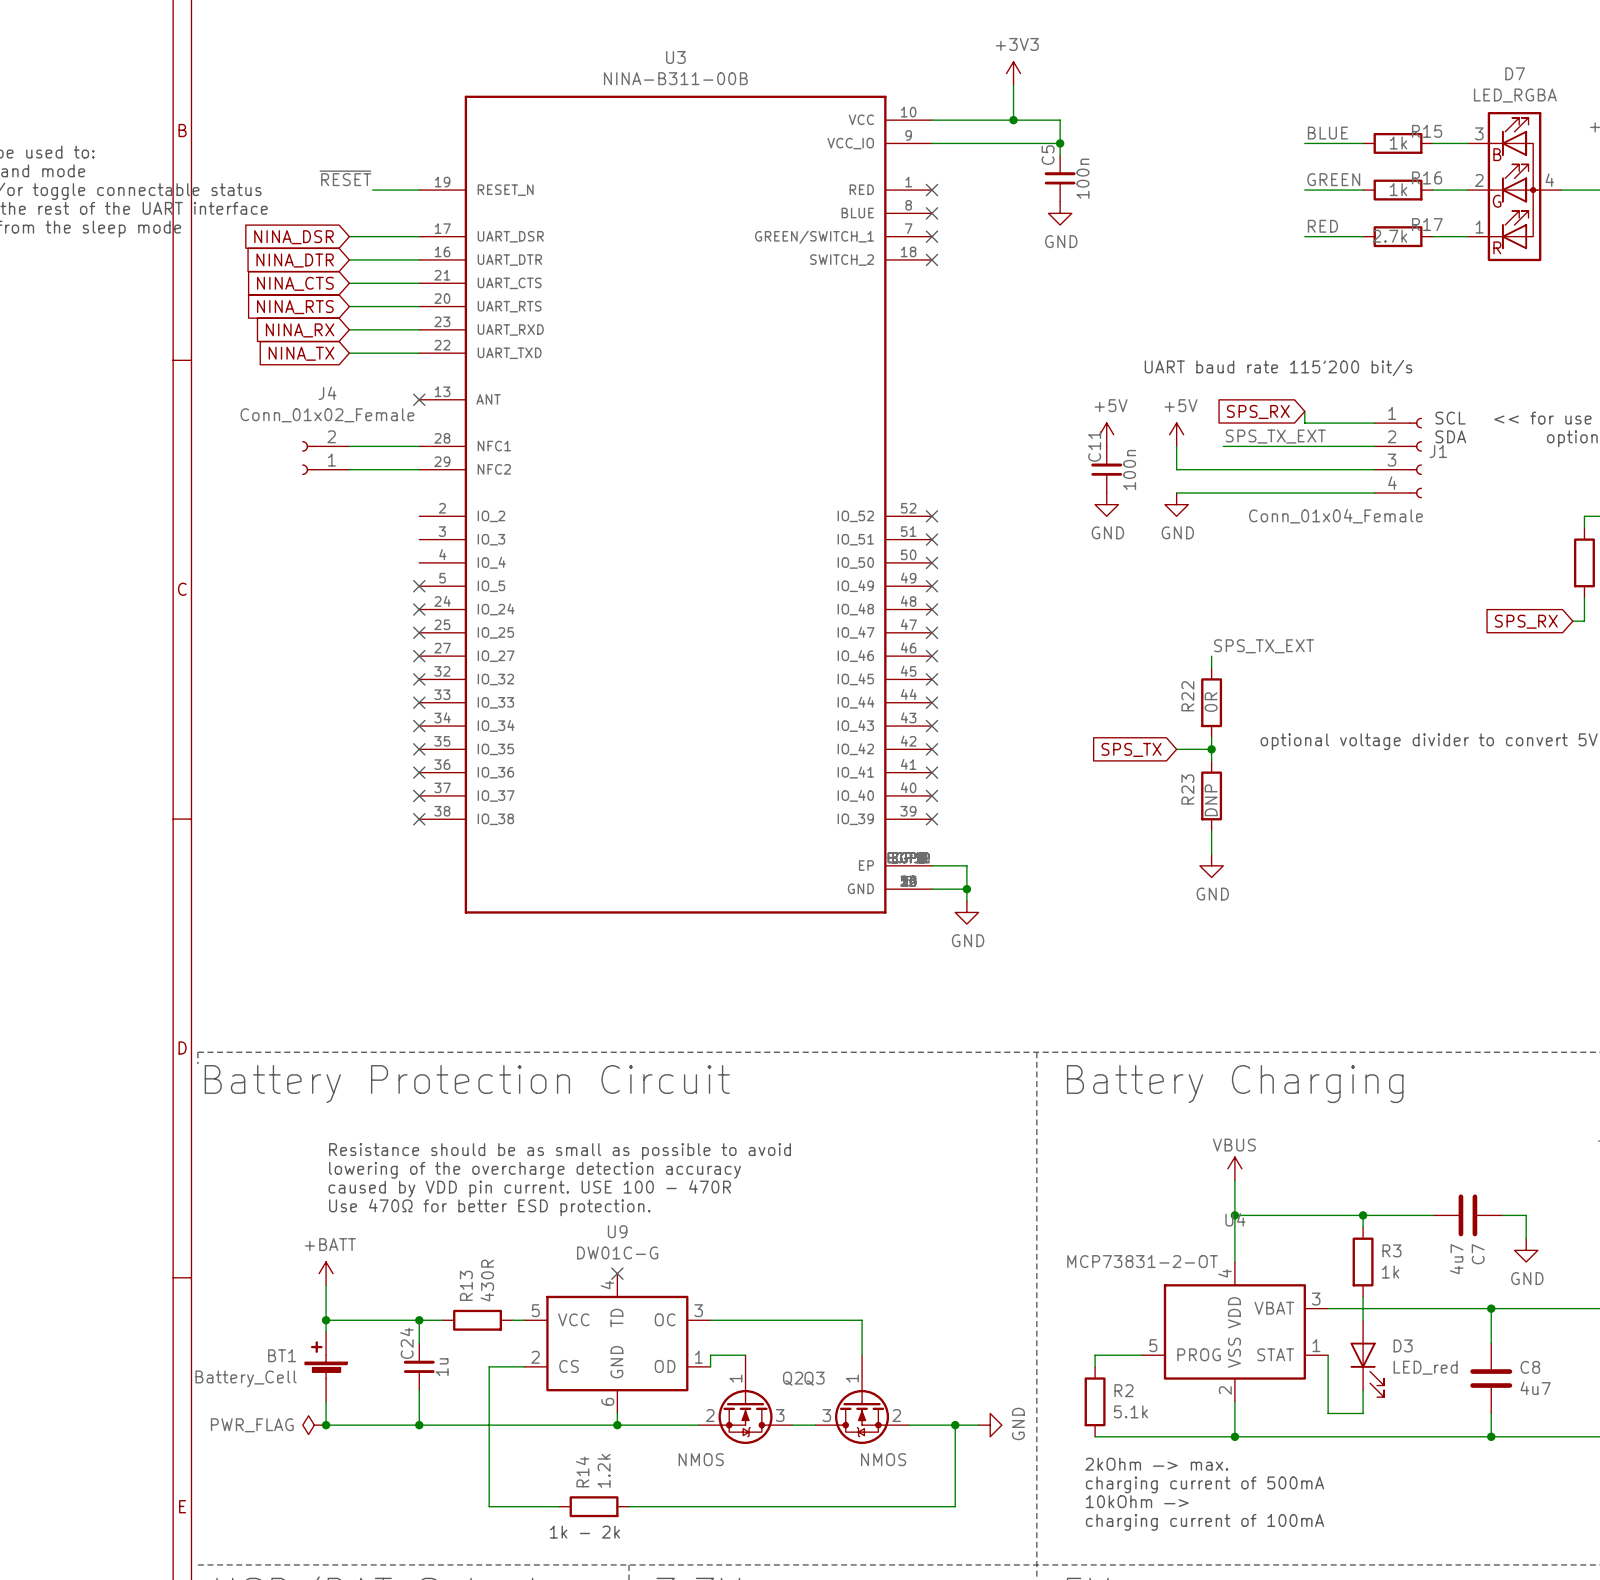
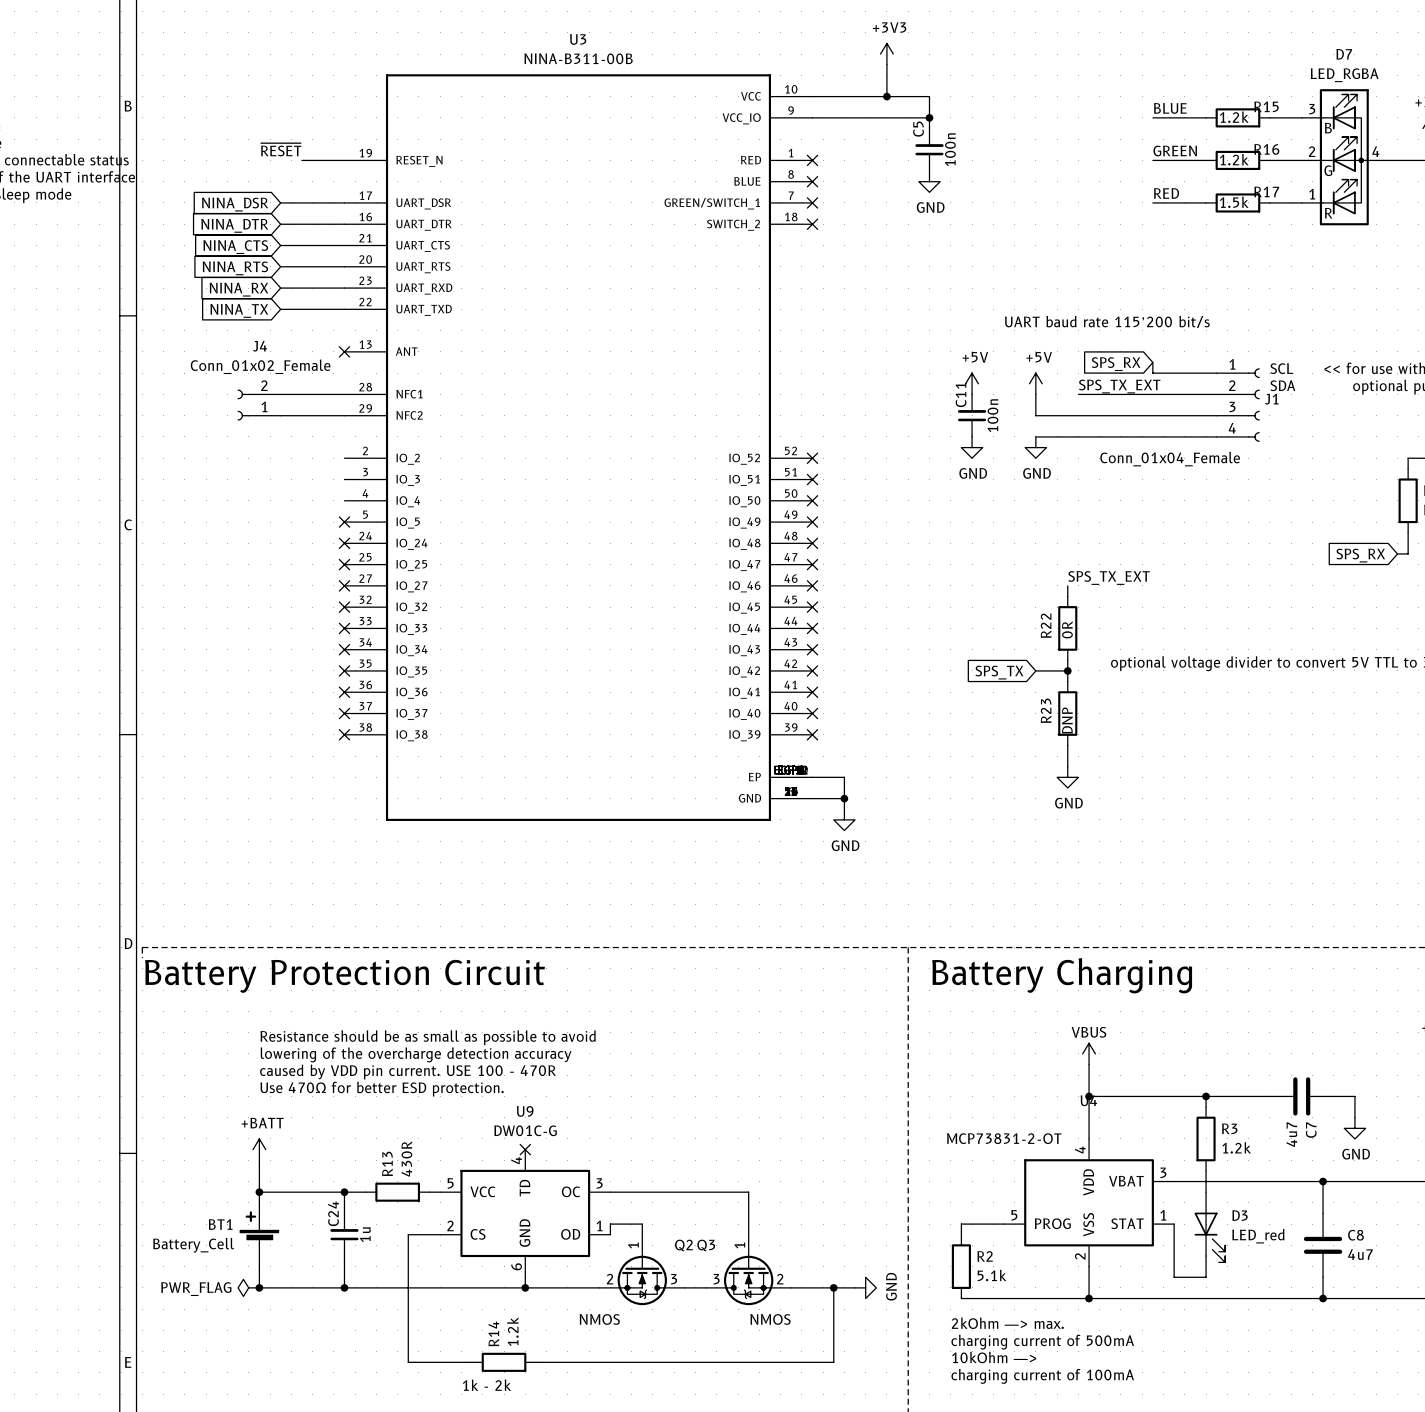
R15 value: 1k (1398, 143) -> 1.2k (1234, 117)
R16 value: 1k (1398, 189) -> 1.2k (1234, 159)
R17 value: 2.7k (1389, 236) -> 1.5k (1234, 202)
R3 value: 1k (1390, 1272) -> 1.2k (1236, 1147)

